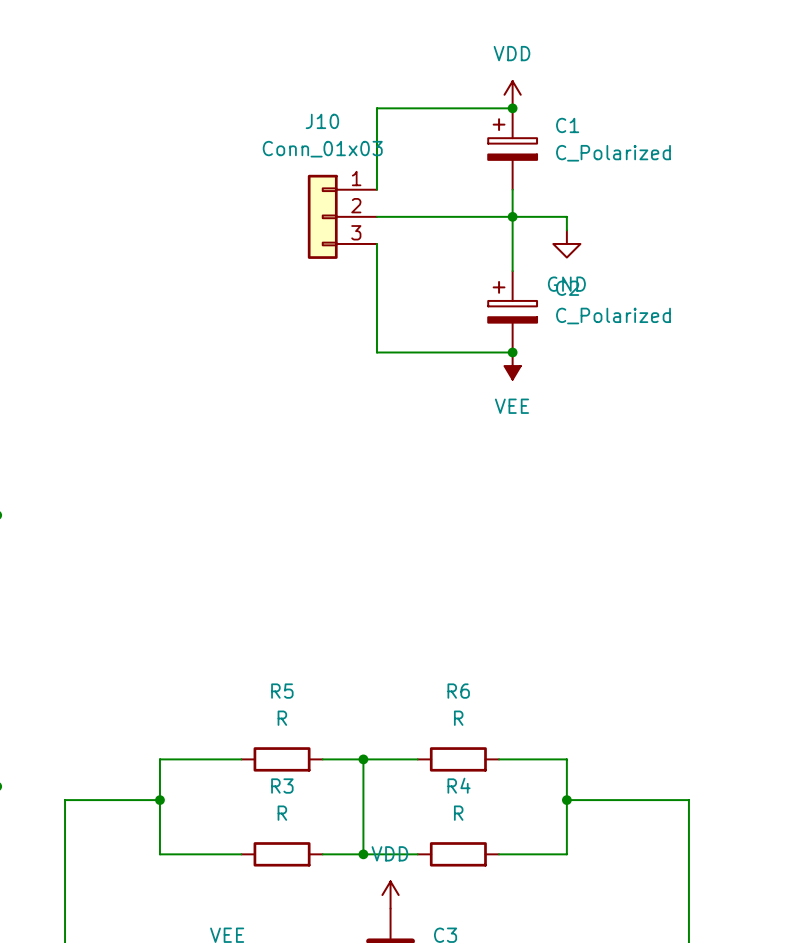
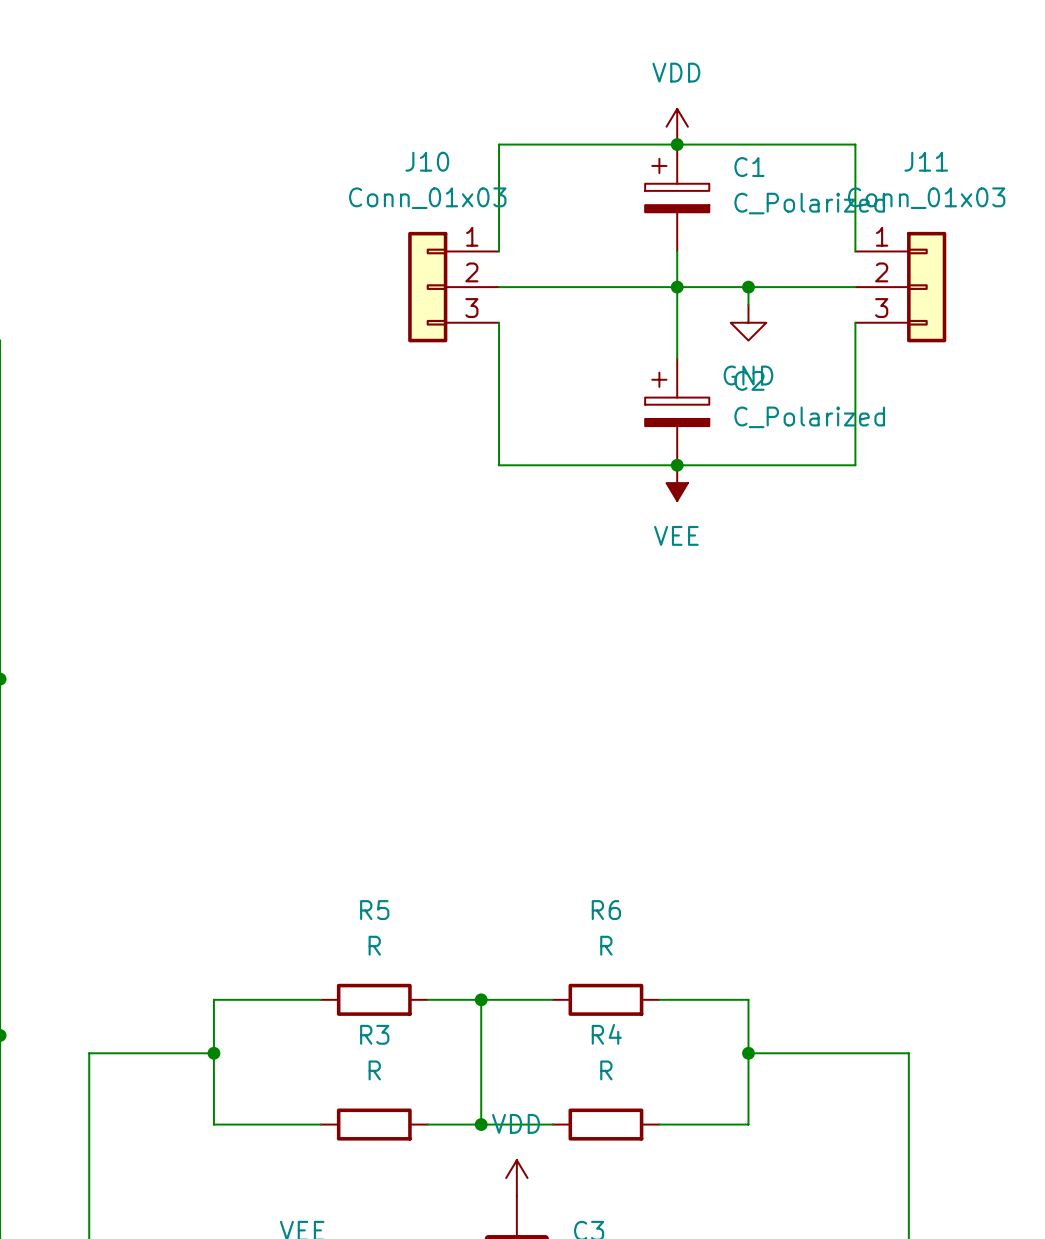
wire: none -> (677, 144) (855, 144) (855, 251)
wire: none -> (748, 287) (855, 287)
junction: none -> (748, 287)
J11: none -> Conn_01x03 (900, 287)
wire: none -> (855, 322) (855, 465) (677, 465)

